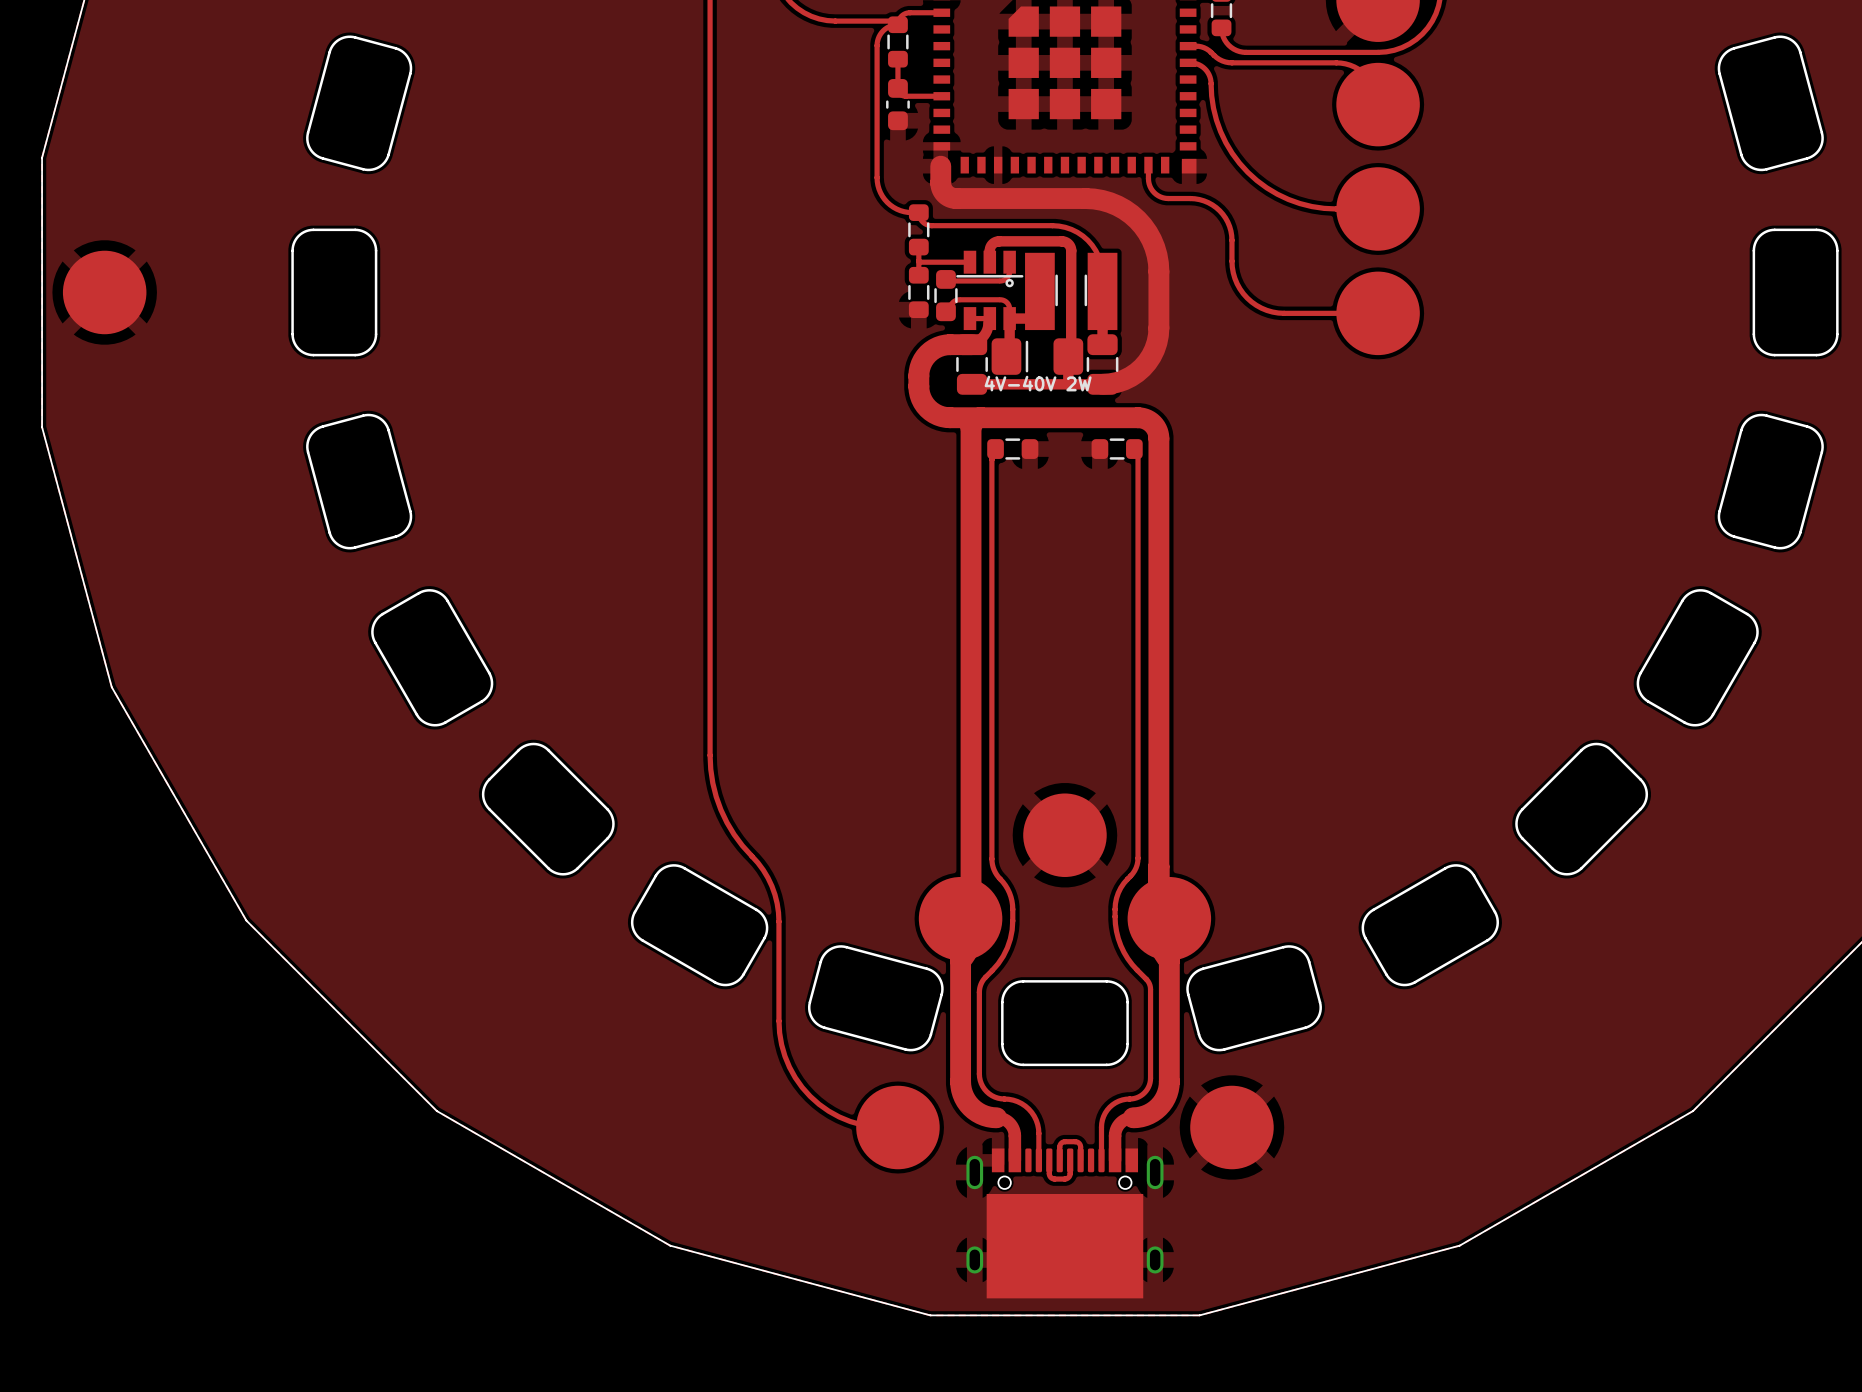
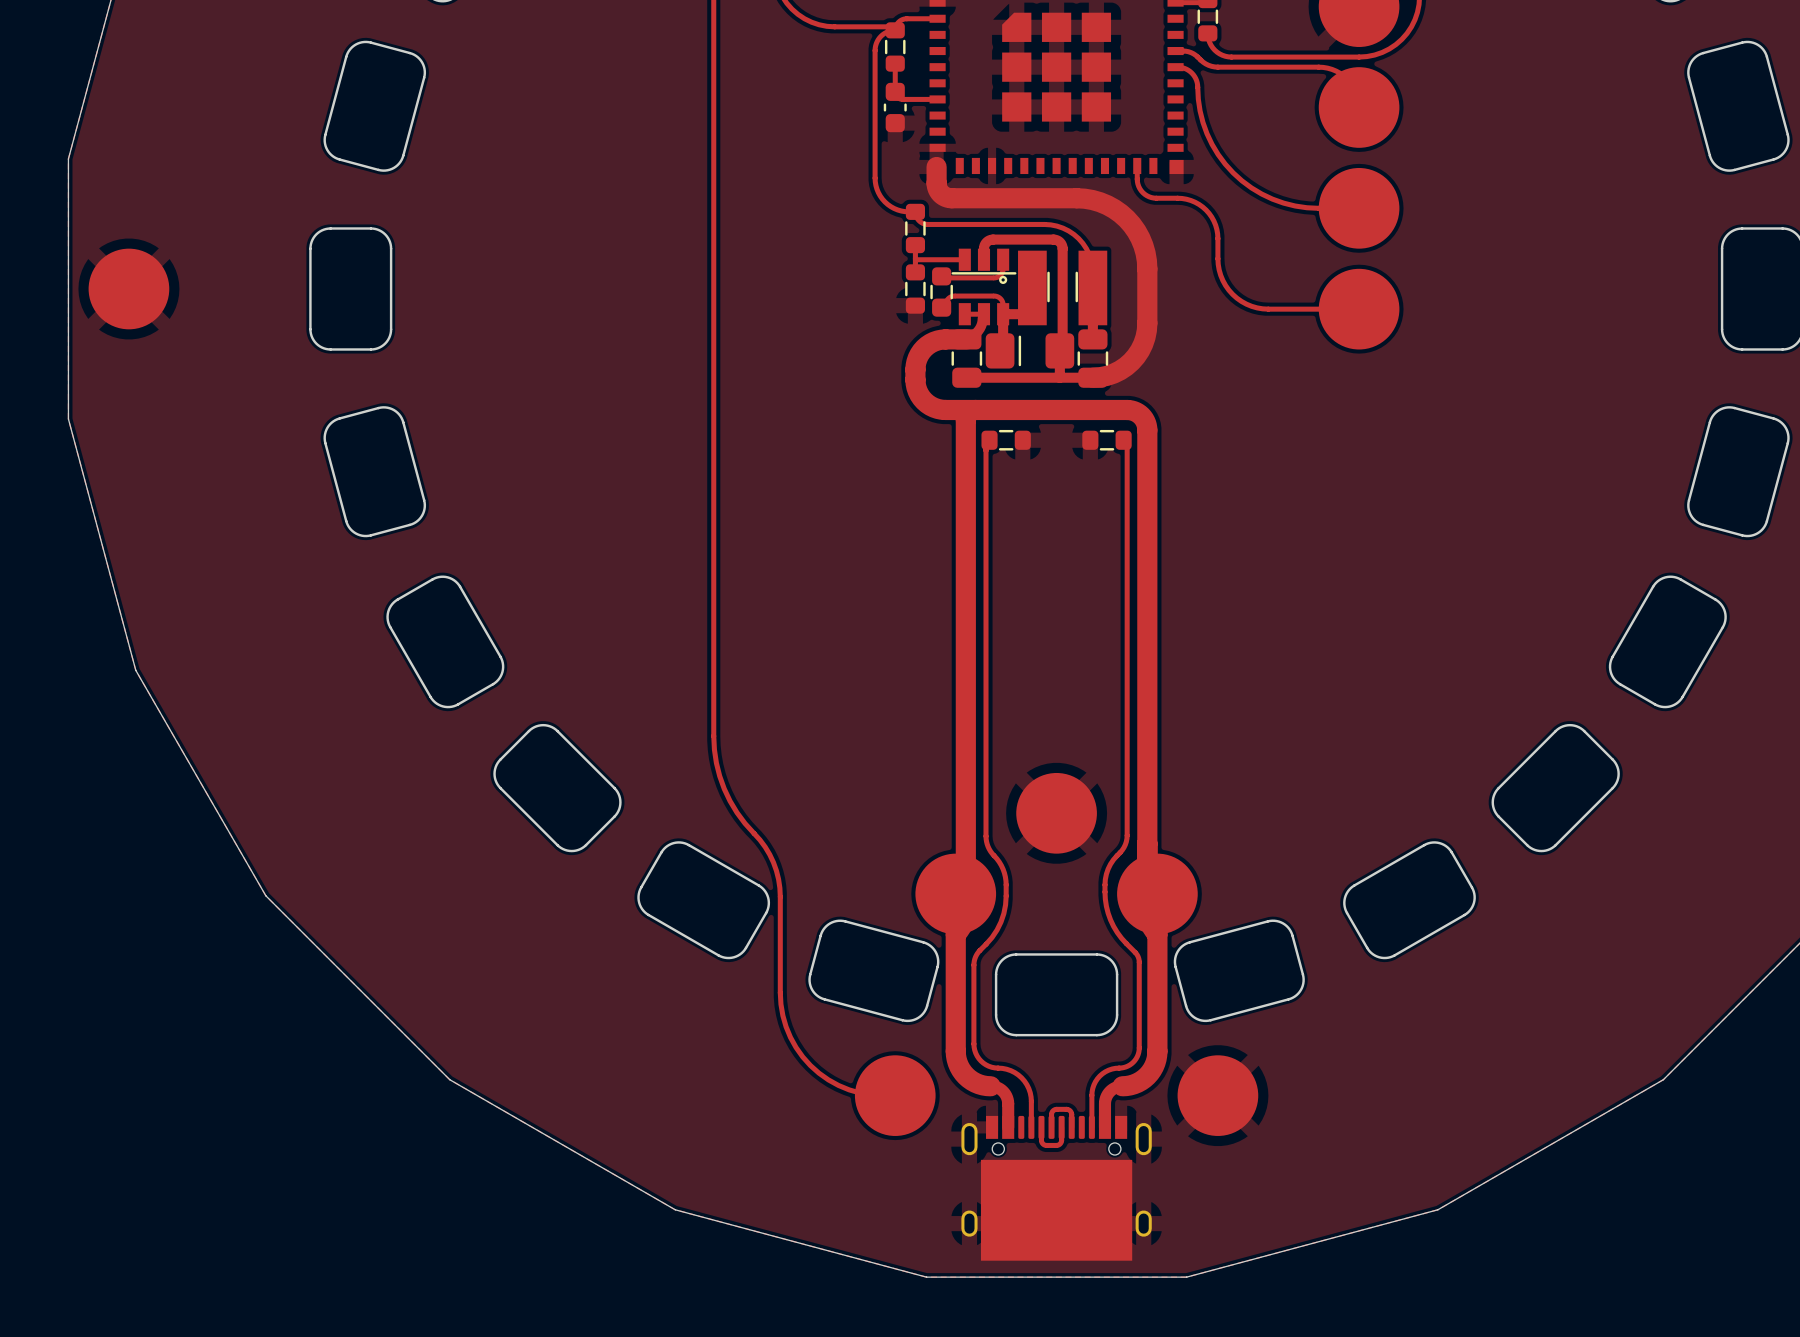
part text: 4V-40V 2W (1038, 383) -> none

